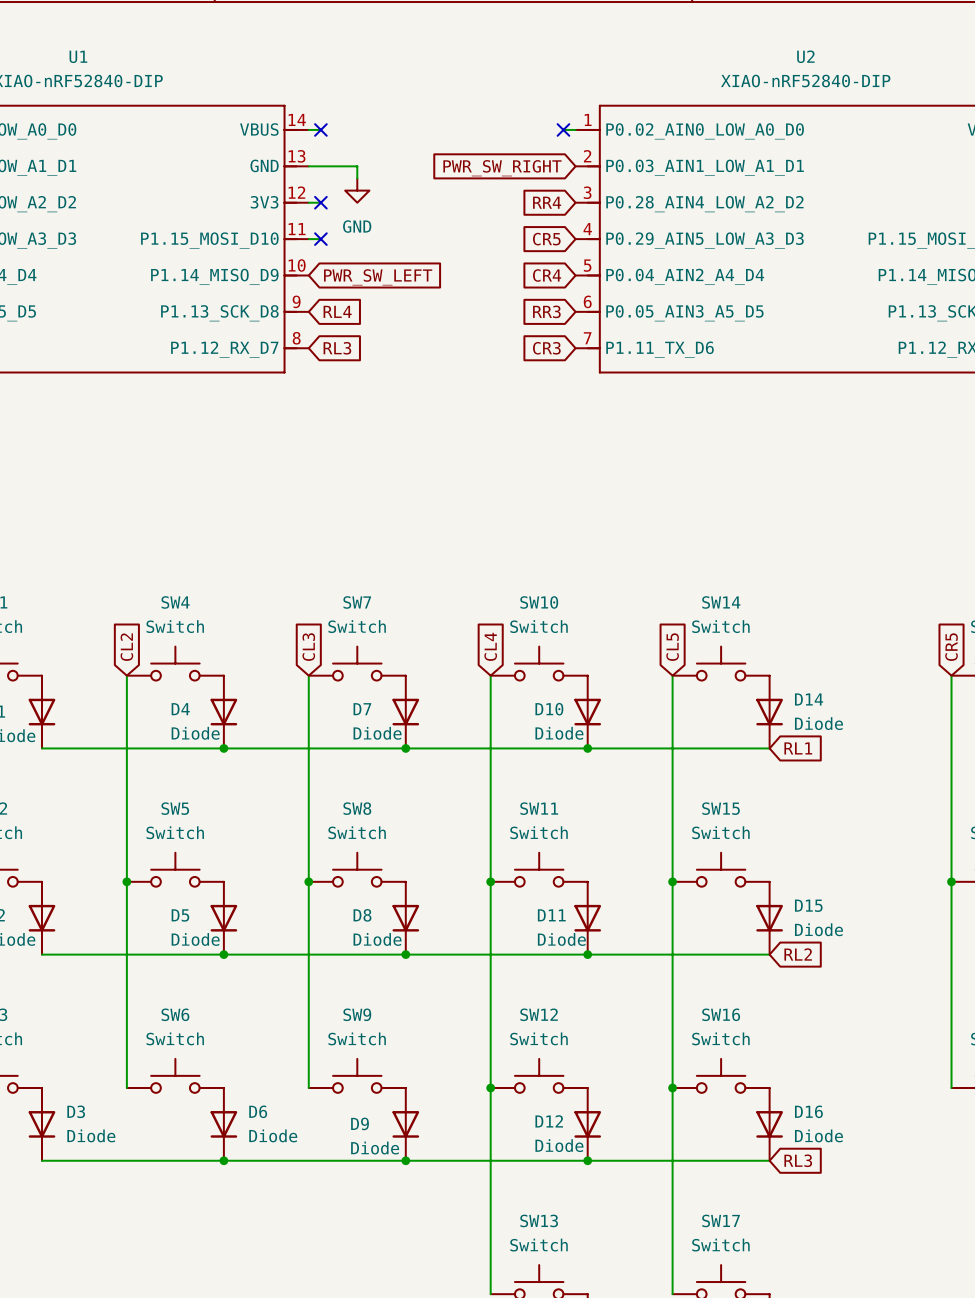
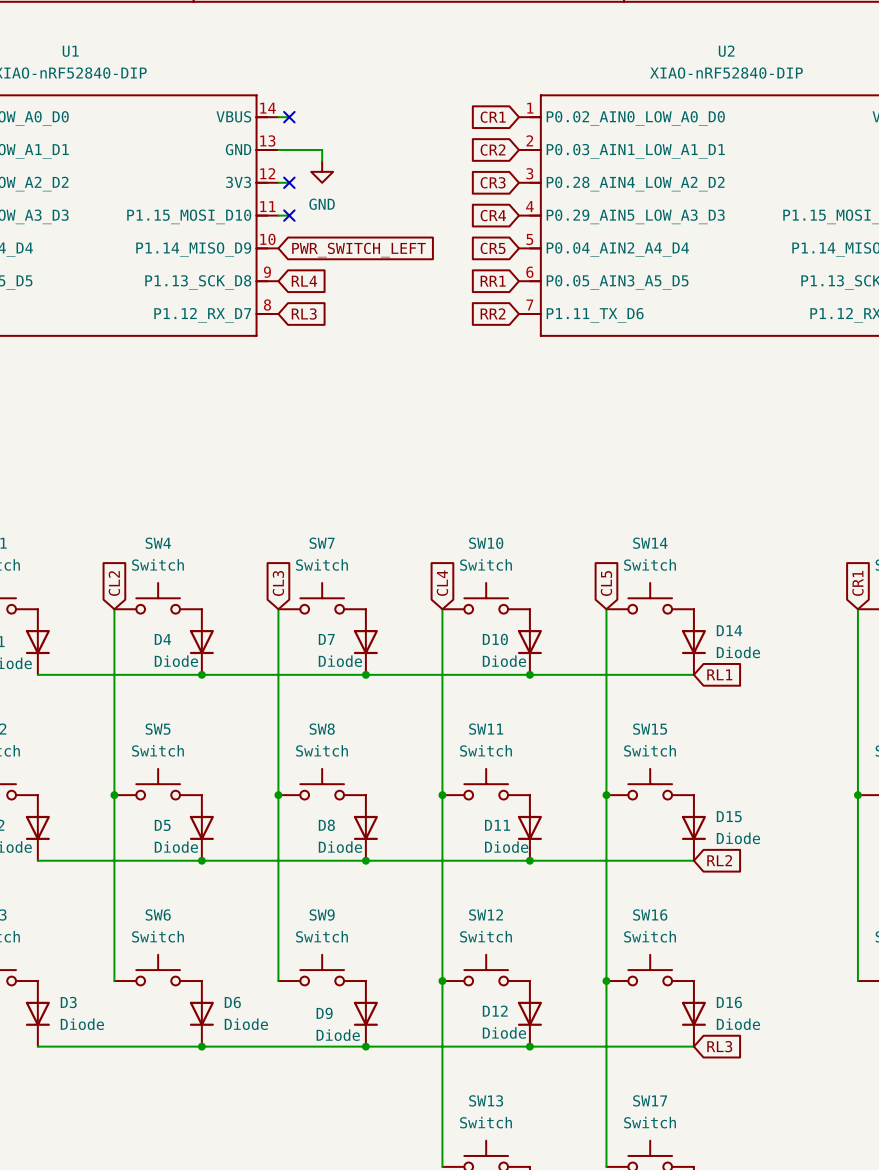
global label: none -> CR1 (493, 117)
wire: (563, 129) (575, 129) -> none
no-connect mark: (563, 129) -> none
global label: PWR_SW_RIGHT (502, 168) -> CR2 (493, 149)
global label: RR4 (547, 202) -> CR3 (493, 182)
global label: CR5 (546, 239) -> CR4 (493, 215)
global label: CR4 (547, 275) -> CR5 (493, 248)
global label: PWR_SW_LEFT (378, 277) -> PWR_SWITCH_LEFT (359, 250)
global label: RR3 (546, 311) -> RR1 (493, 281)
global label: CR3 (546, 348) -> RR2 (493, 313)
global label: CR5 (951, 647) -> CR1 (857, 583)

